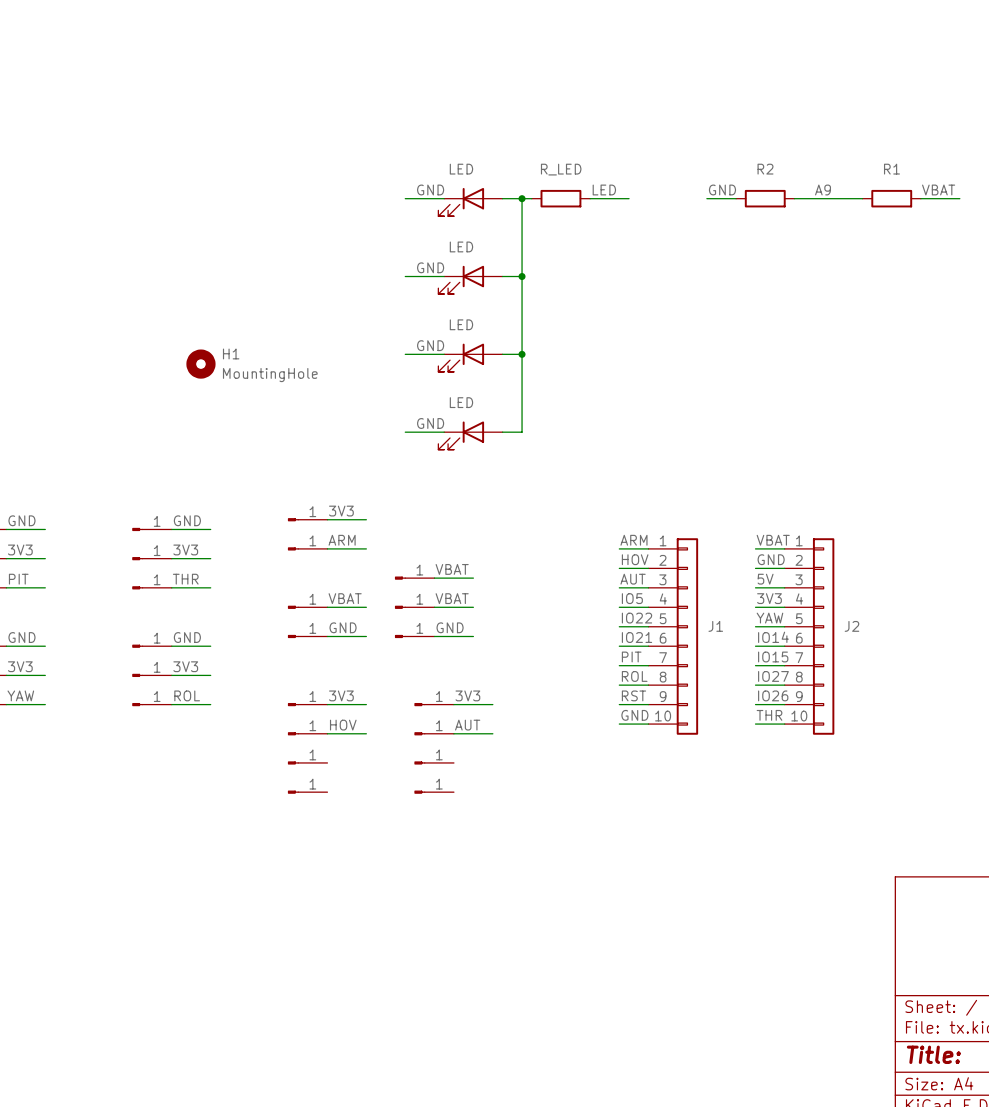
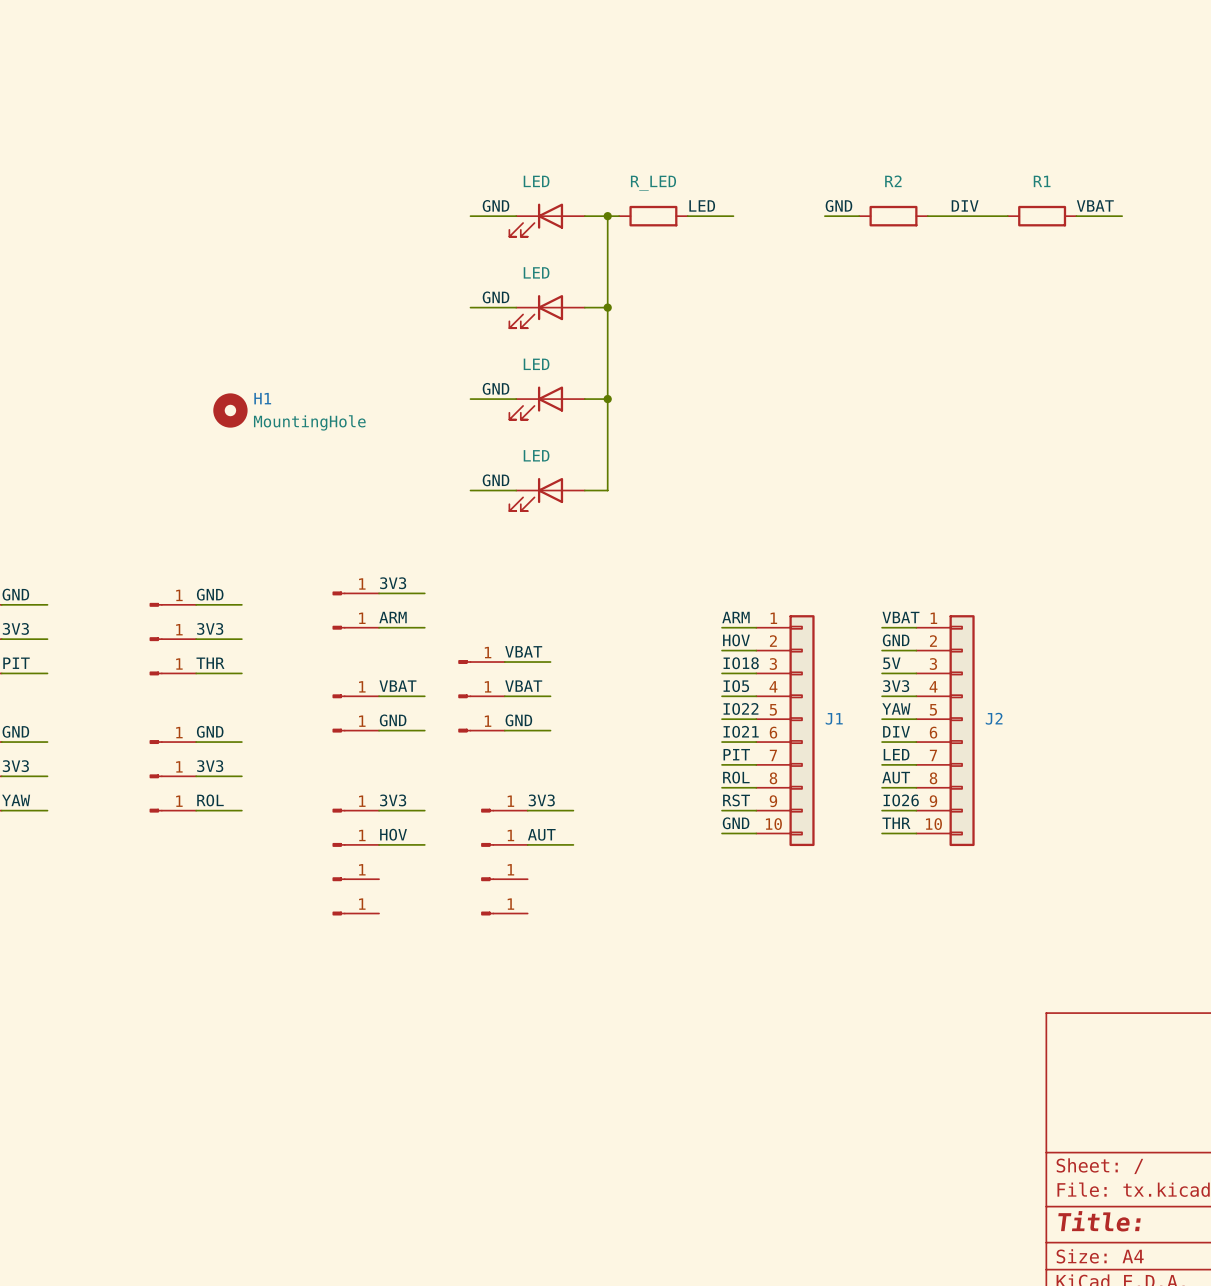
label: A9 (823, 189) -> DIV (965, 205)
label: AUT (633, 579) -> IO18 (741, 663)
label: IO14 (773, 637) -> DIV (896, 731)
label: IO15 (773, 656) -> LED (896, 754)
label: IO27 (773, 676) -> AUT (896, 777)

